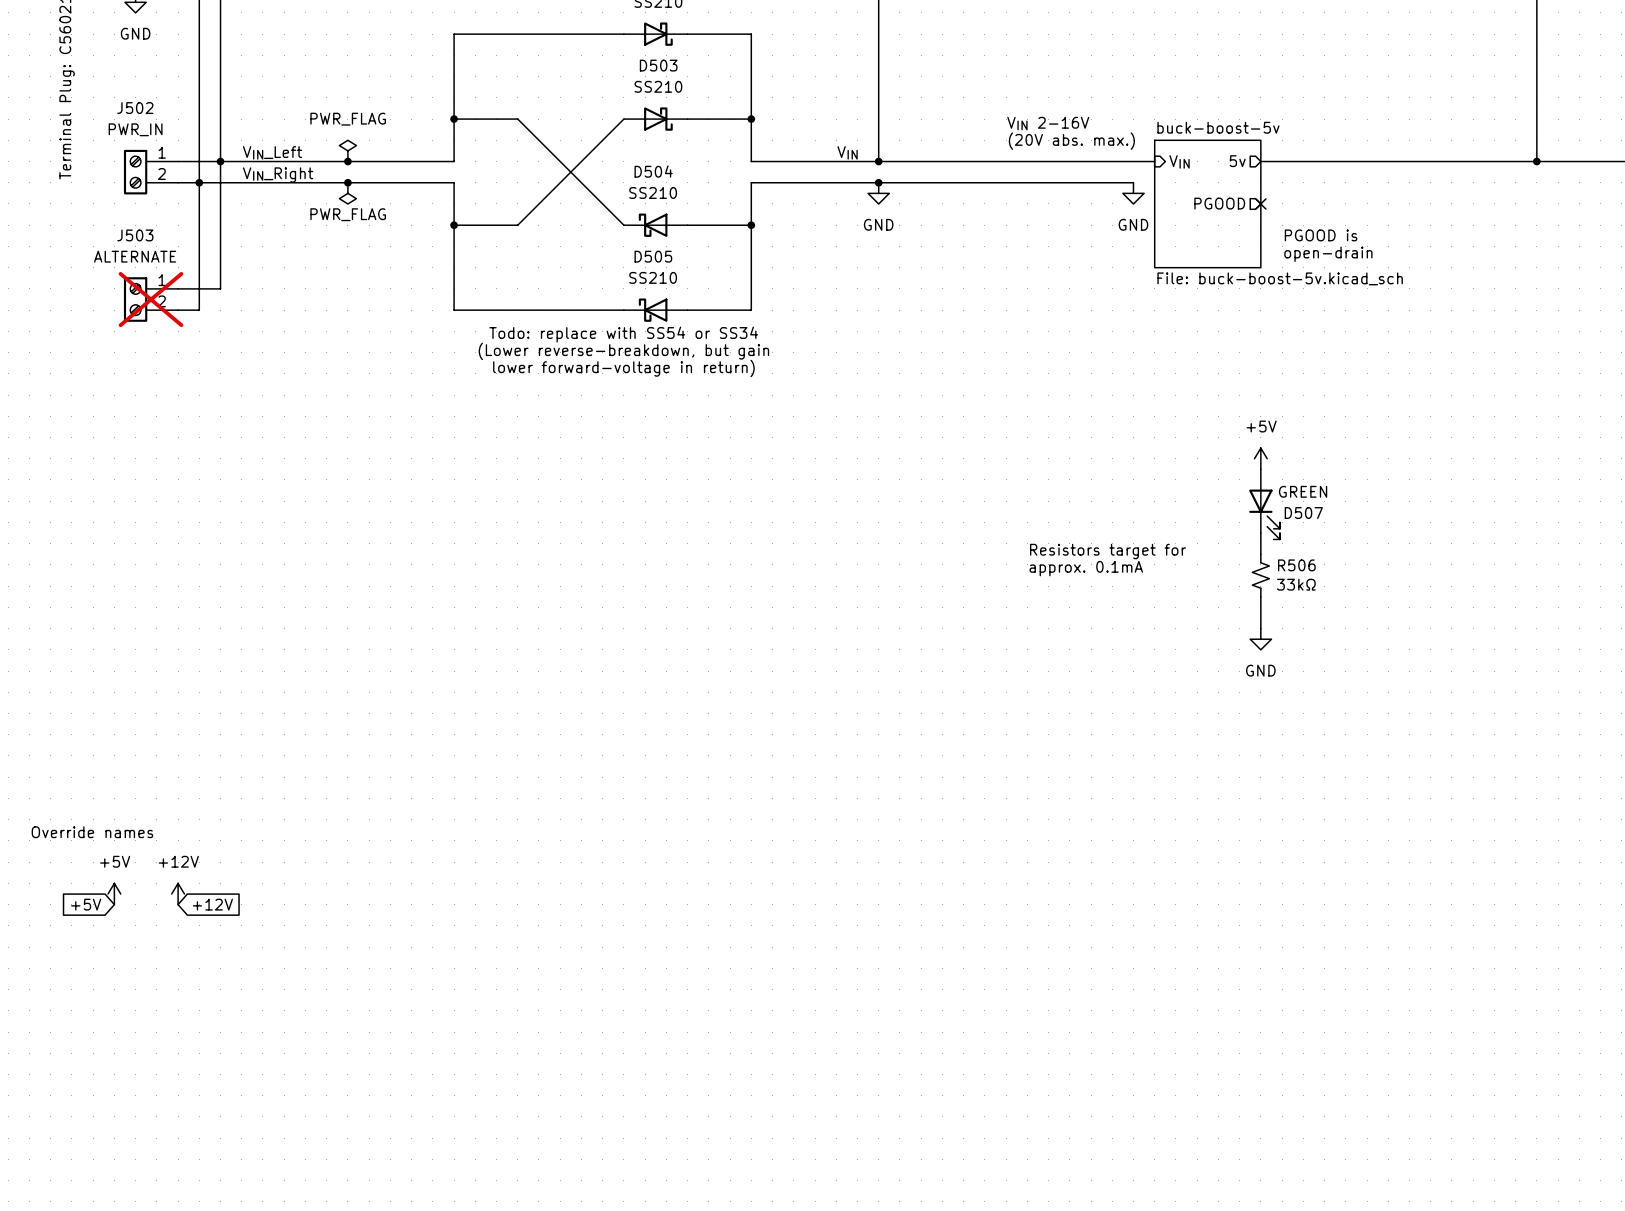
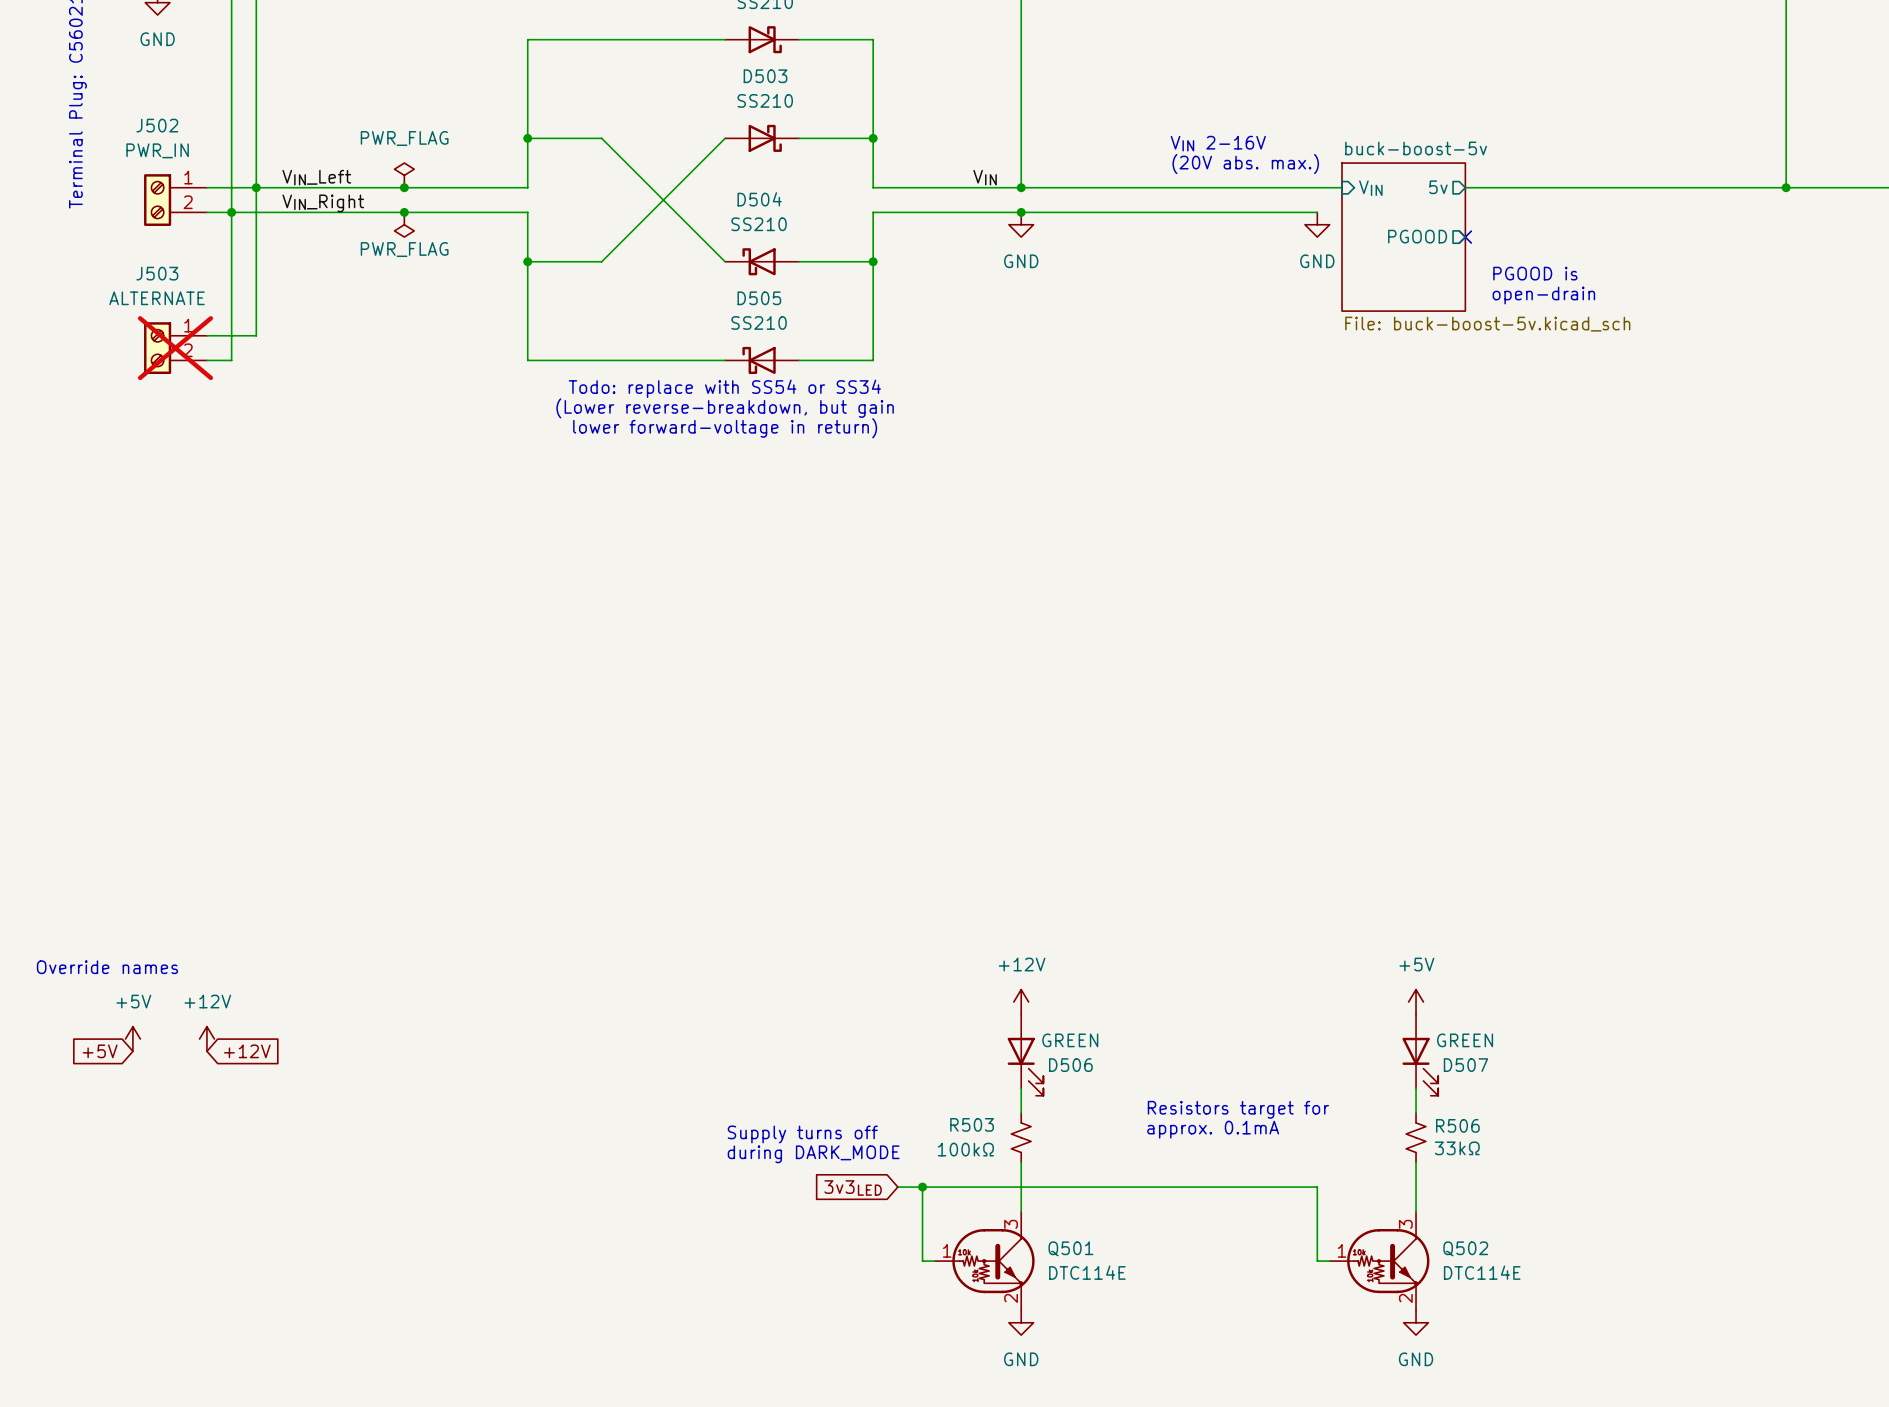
power symbol: +5V (1260, 458) -> none
D507 position: (1264, 504) -> (1420, 1055)
wire: (1260, 533) (1260, 554) -> none
text: Resistors target for (1108, 551) -> none
text: approx. 0.1mA (1086, 568) -> none
R506 position: (1260, 575) -> (1416, 1137)
wire: (1260, 596) (1260, 628) -> none
power symbol: GND (1260, 639) -> none
power symbol: none -> +12V (1021, 1002)
power symbol: none -> +5V (1416, 1002)
D506: none -> GREEN (1025, 1055)
wire: none -> (1021, 1088) (1021, 1113)
wire: none -> (1416, 1088) (1416, 1113)
text: none -> Resistors target for (1238, 1109)
text: none -> approx. 0.1mA (1213, 1129)
text: none -> Supply turns off (802, 1134)
R503: none -> 100kΩ (1021, 1137)
text: none -> during DARK_MODE (813, 1154)
wire: none -> (1021, 1162) (1021, 1211)
wire: none -> (1416, 1162) (1416, 1211)
wire: none -> (897, 1187) (1317, 1187) (1317, 1261) (1329, 1261)
wire: none -> (922, 1187) (922, 1261) (934, 1261)
junction: none -> (922, 1187)
global label: none -> 3v3LED (853, 1187)
Q501: none -> DTC114E (984, 1261)
Q502: none -> DTC114E (1379, 1261)
power symbol: none -> GND (1021, 1322)
power symbol: none -> GND (1416, 1322)

